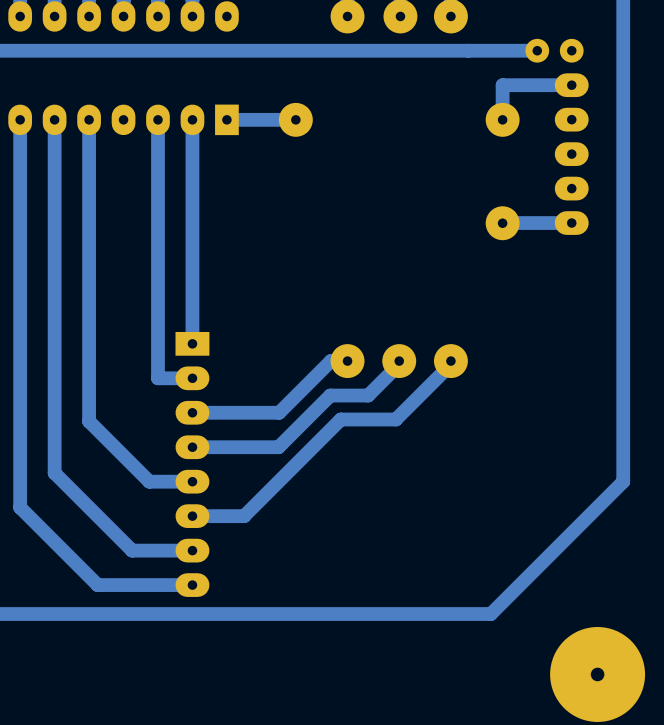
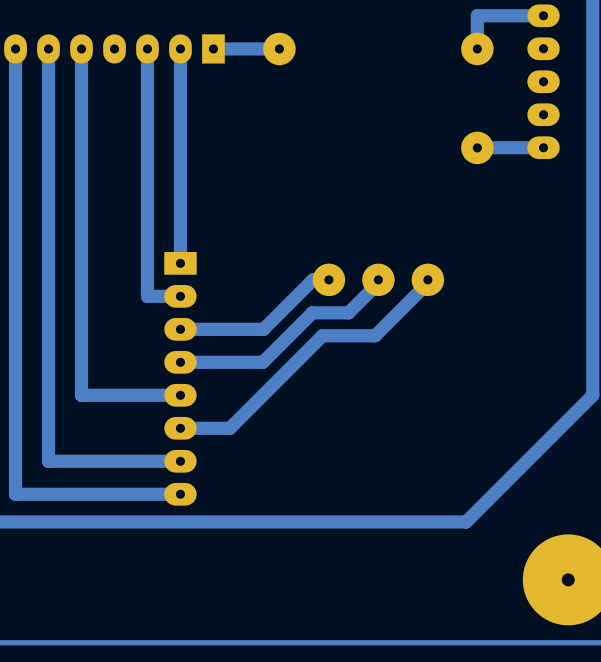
track: (89, 421) (149, 481) -> (81, 337) (81, 395) (139, 395)
track: (54, 473) (132, 550) -> (48, 387) (48, 461) (122, 461)
track: (20, 507) (97, 585) -> (15, 420) (15, 494) (89, 494)

